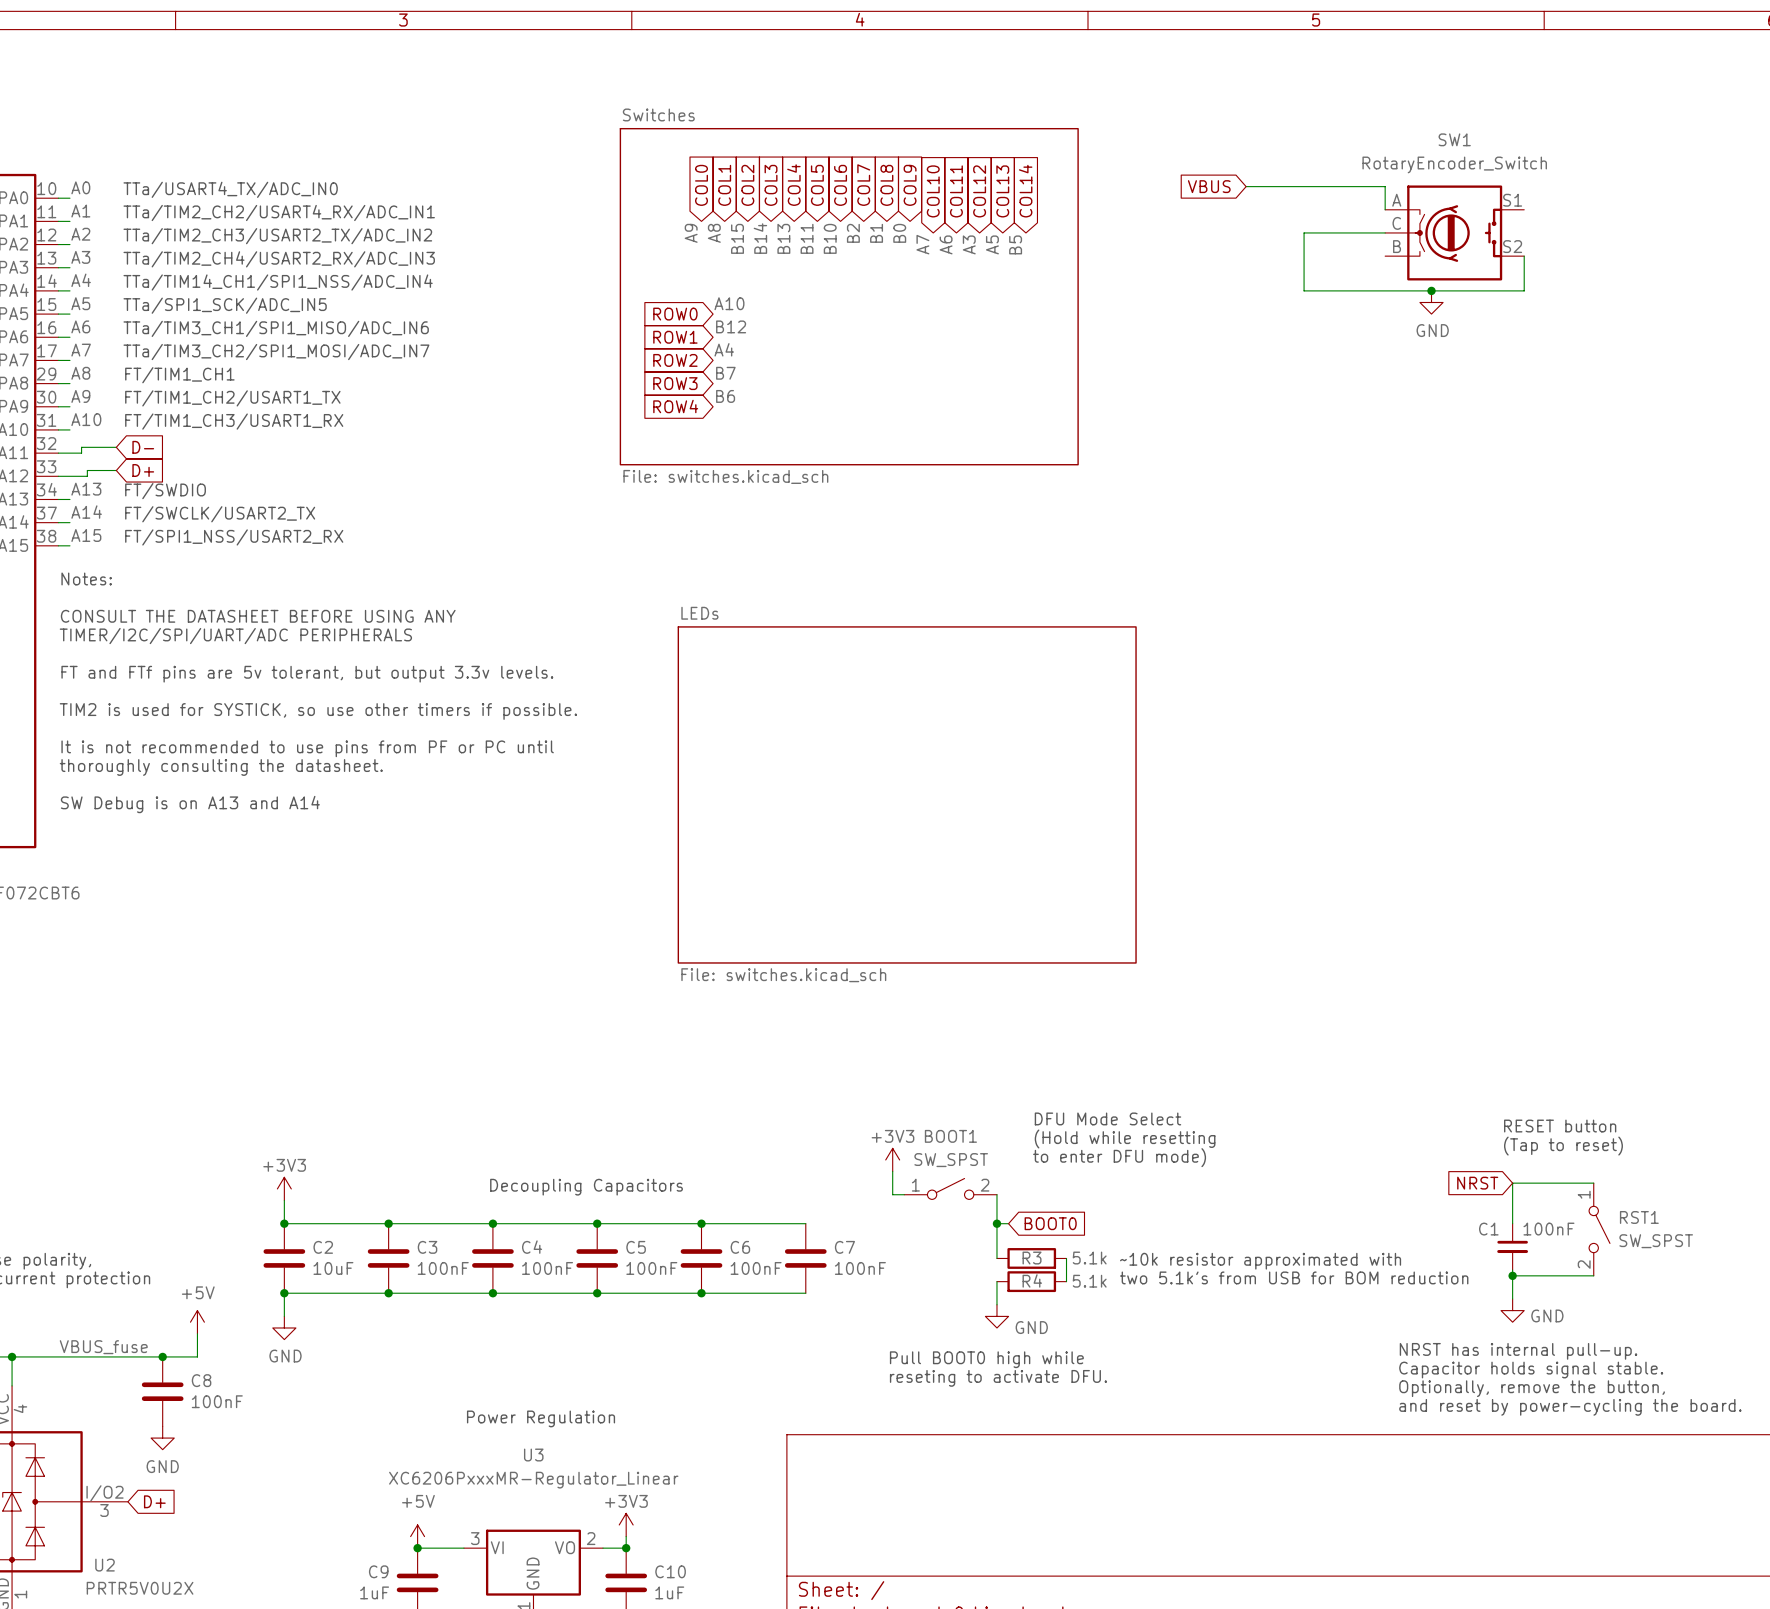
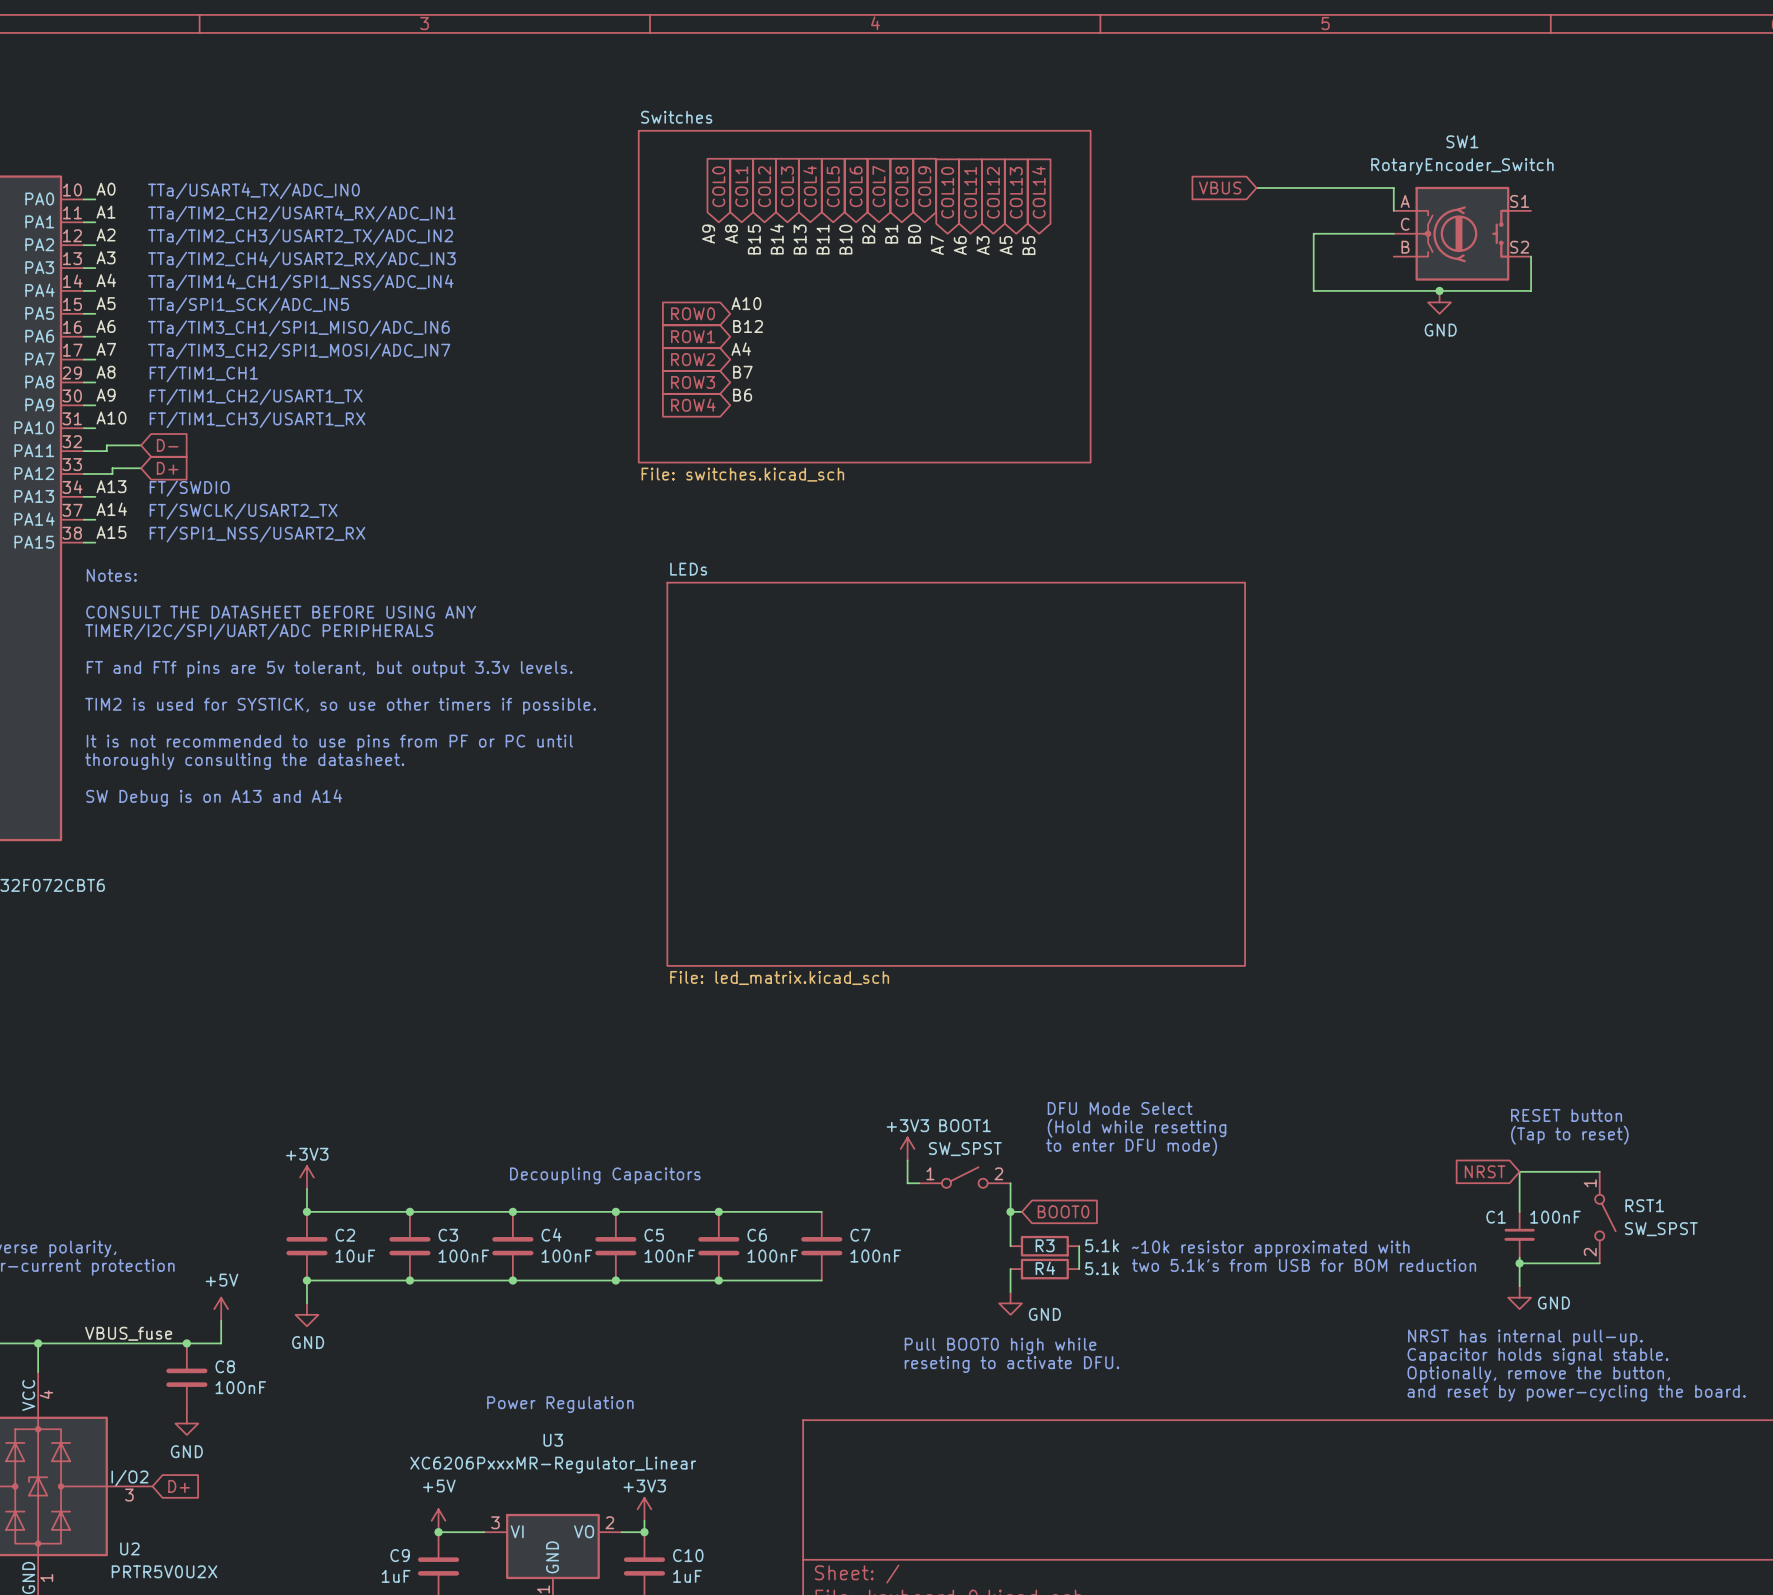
sheet LEDs: none -> File: led_matrix.kicad_sch (956, 774)
sheet LEDs: File: switches.kicad_sch (907, 794) -> none

